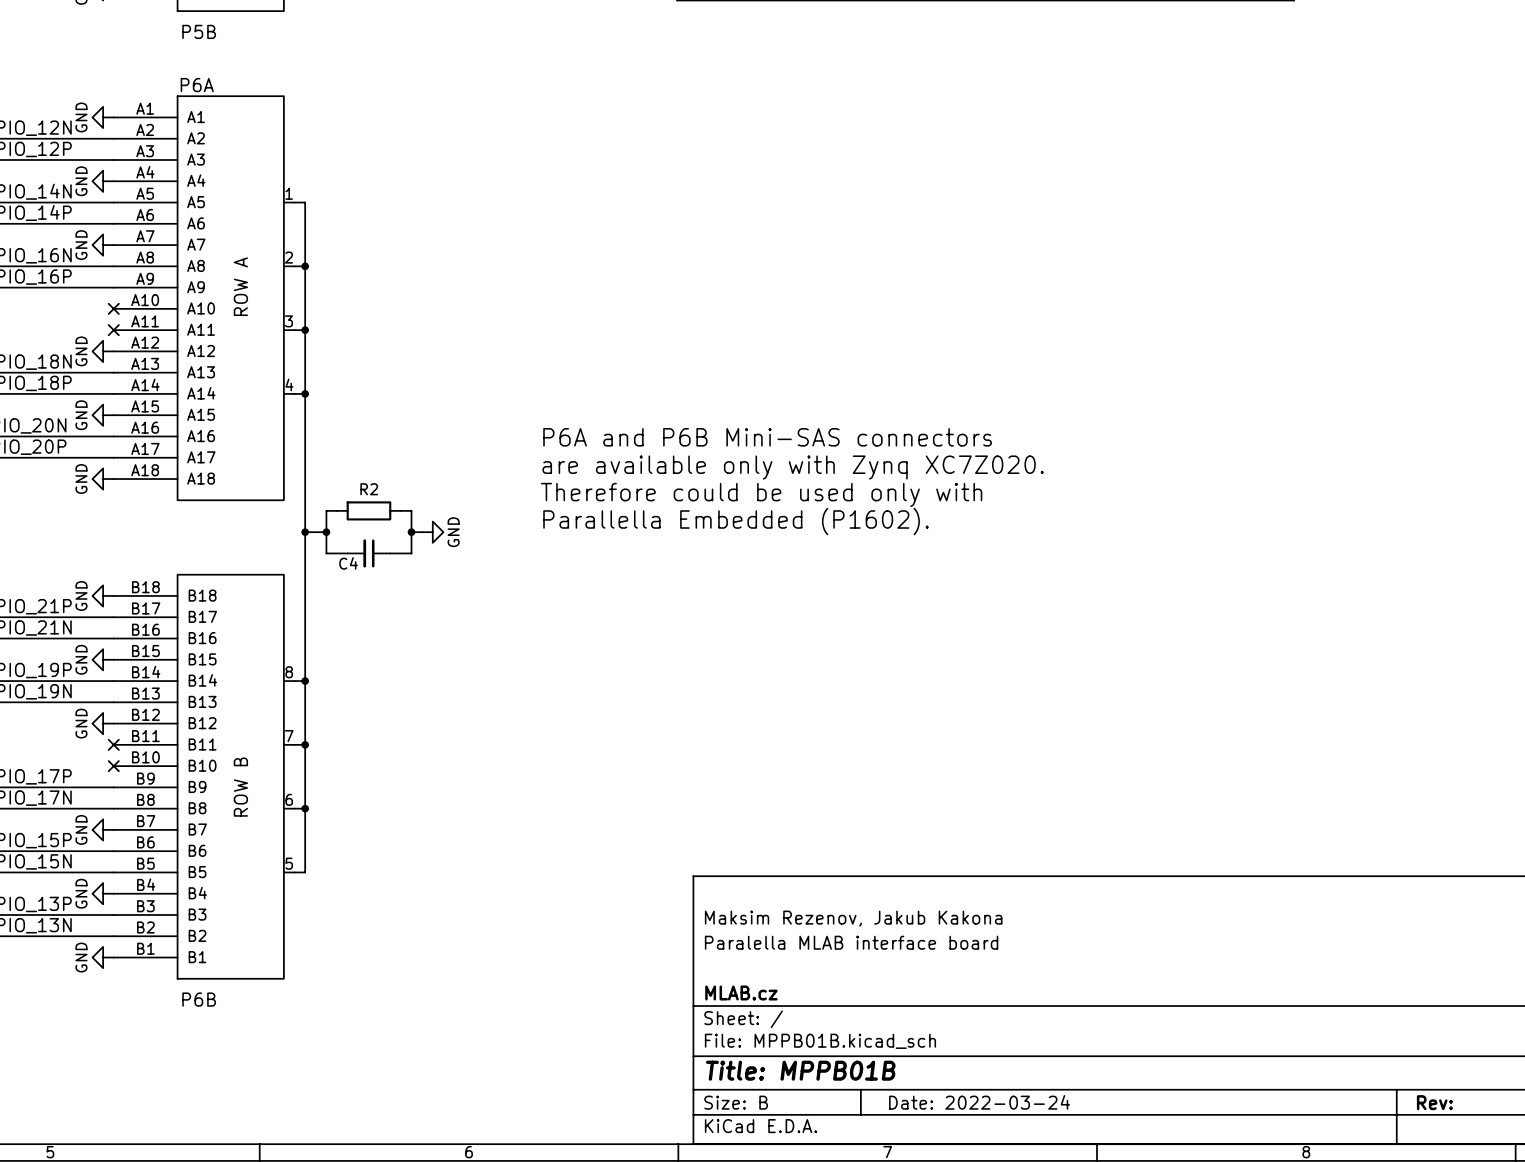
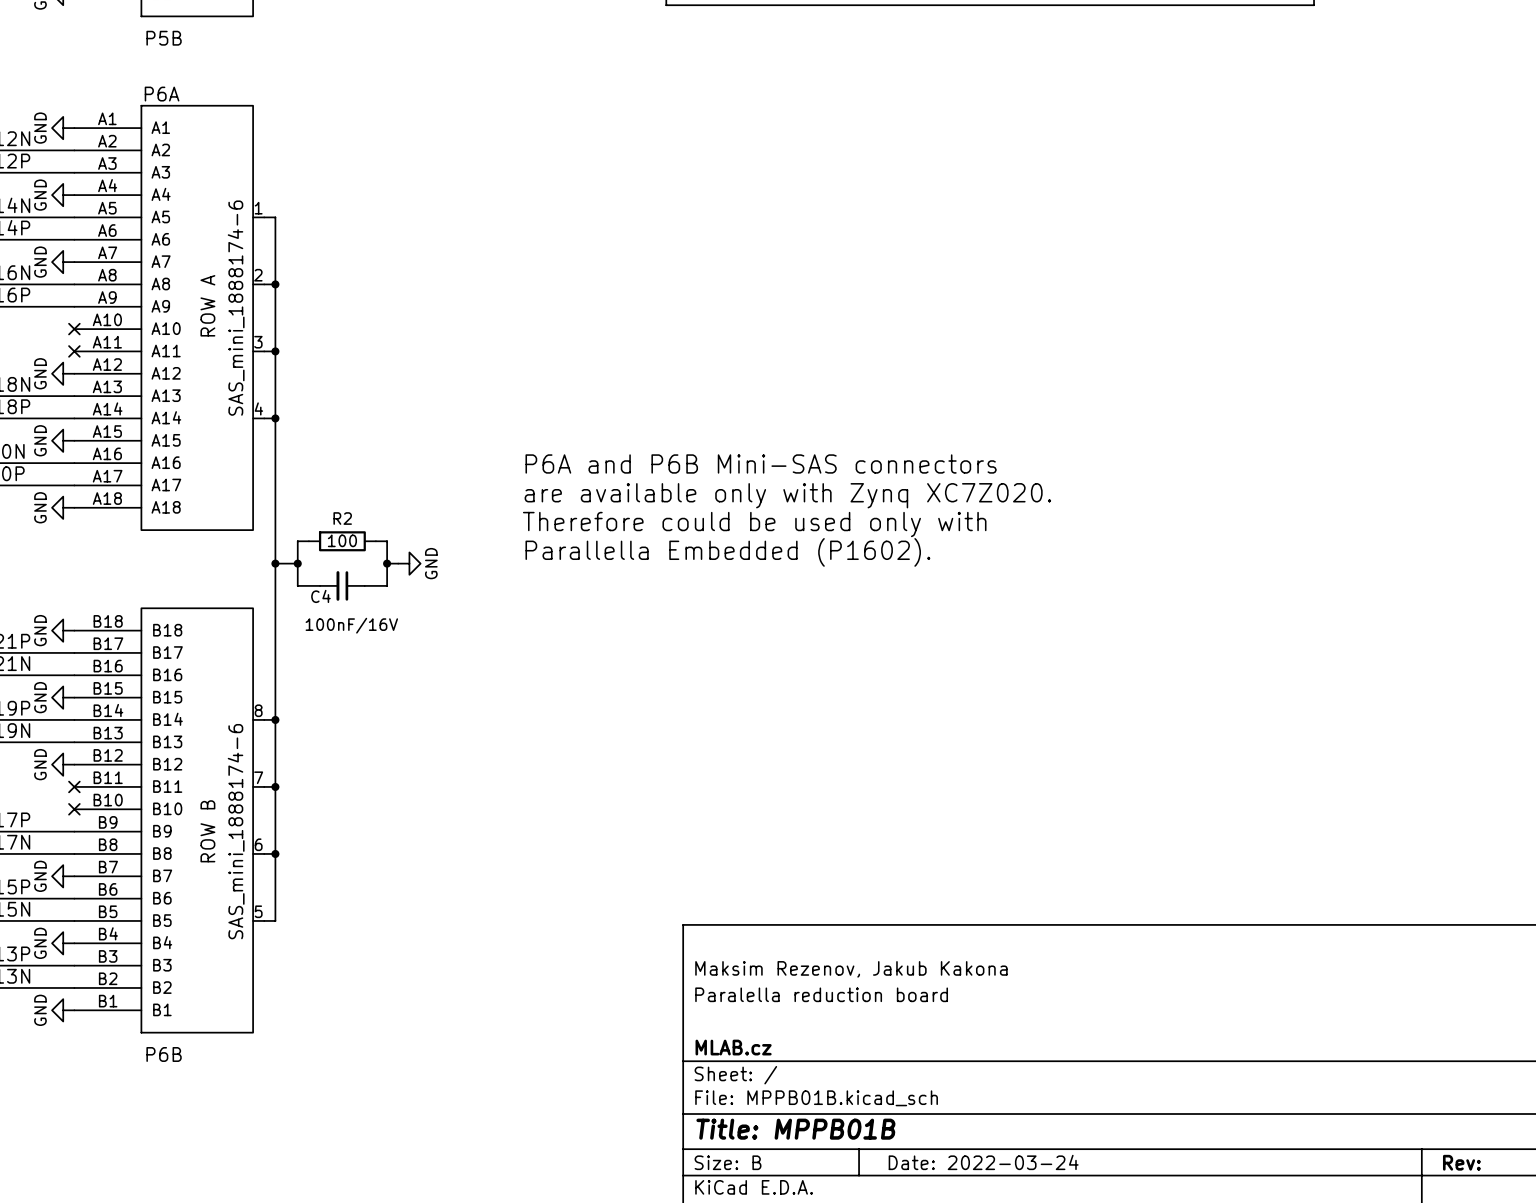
P6A value: none -> SAS_mini_1888174-6 (236, 308)
R2 value: none -> 100 (342, 540)
C4 value: none -> 100nF/16V (351, 625)
P6B value: none -> SAS_mini_1888174-6 (236, 831)
title block: Paralella MLAB interface board (851, 942) -> Paralella reduction board (821, 994)

